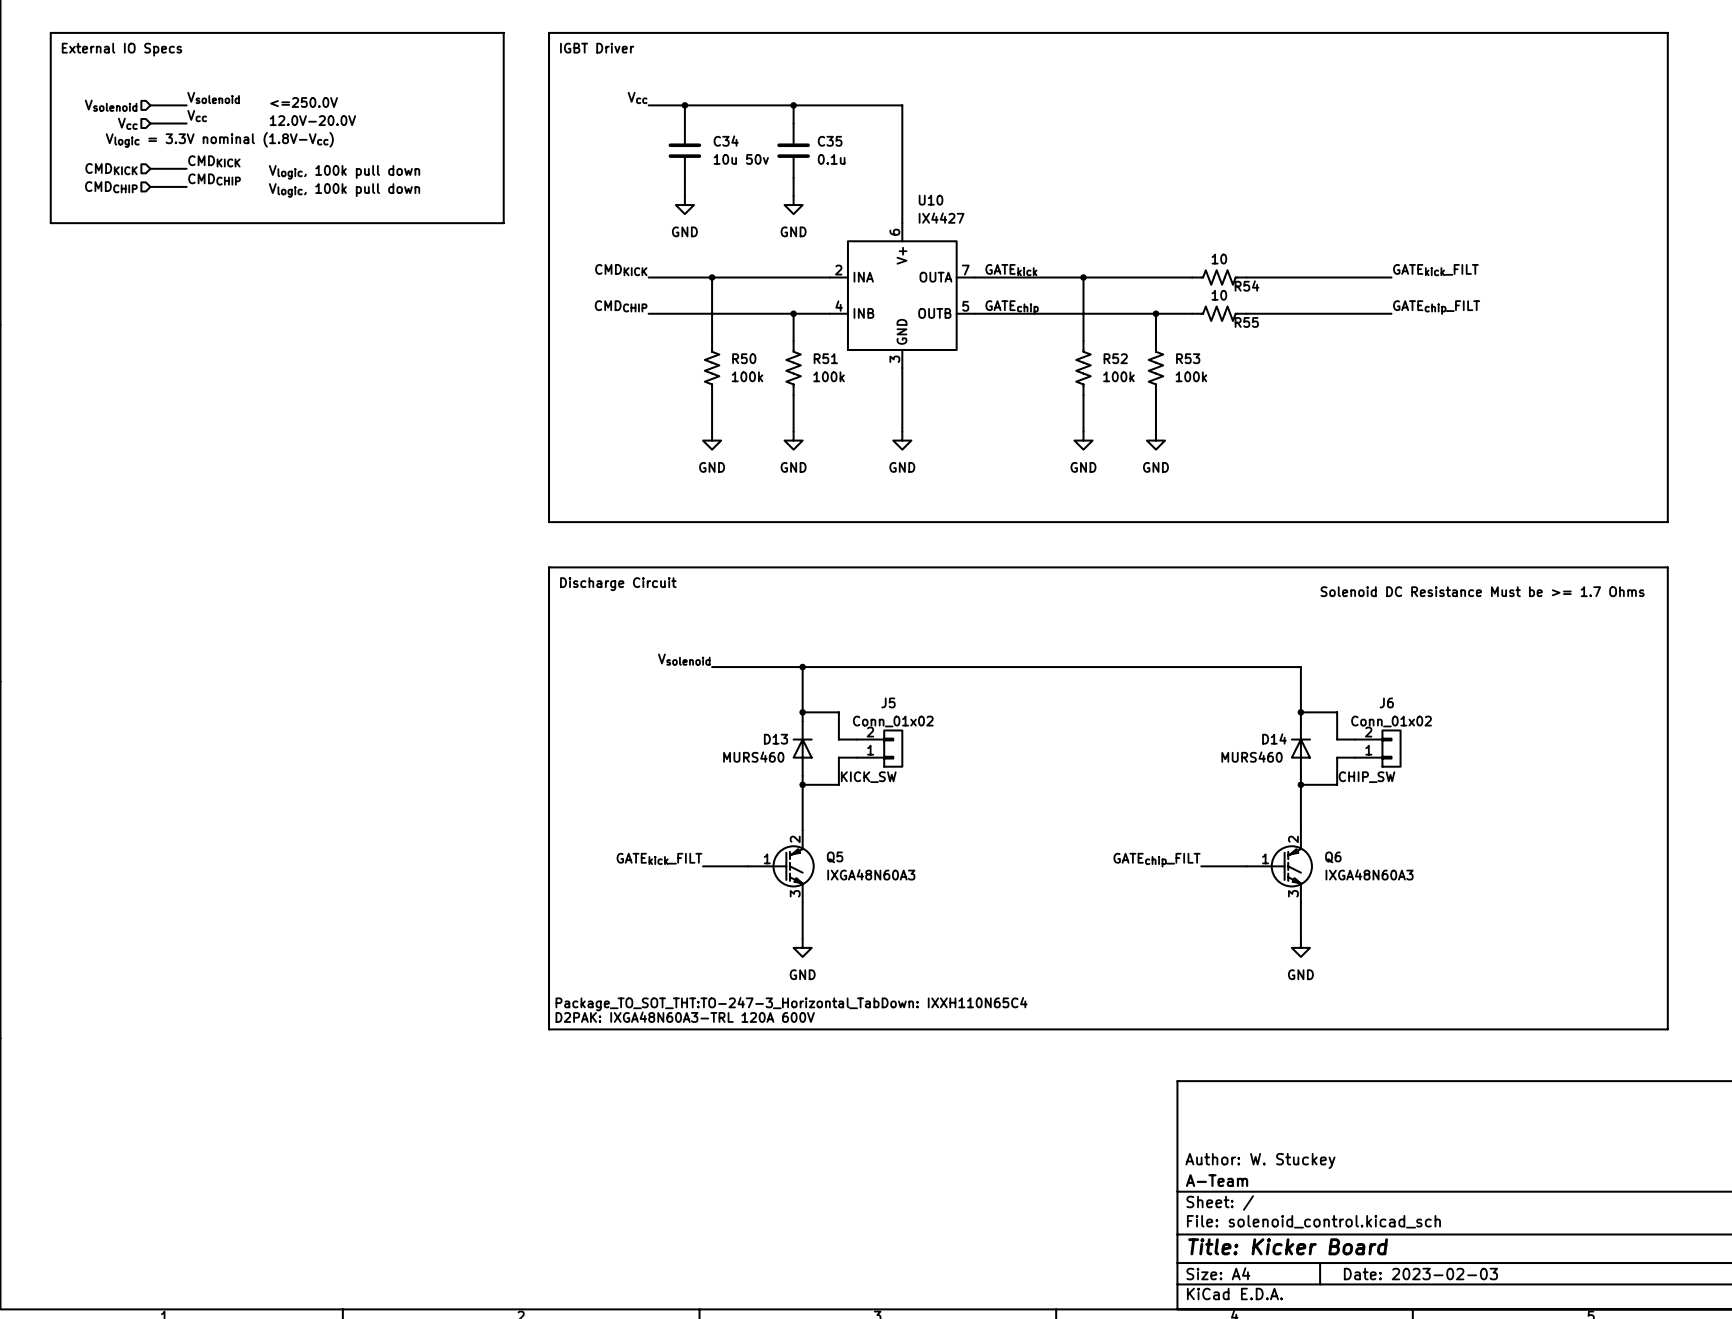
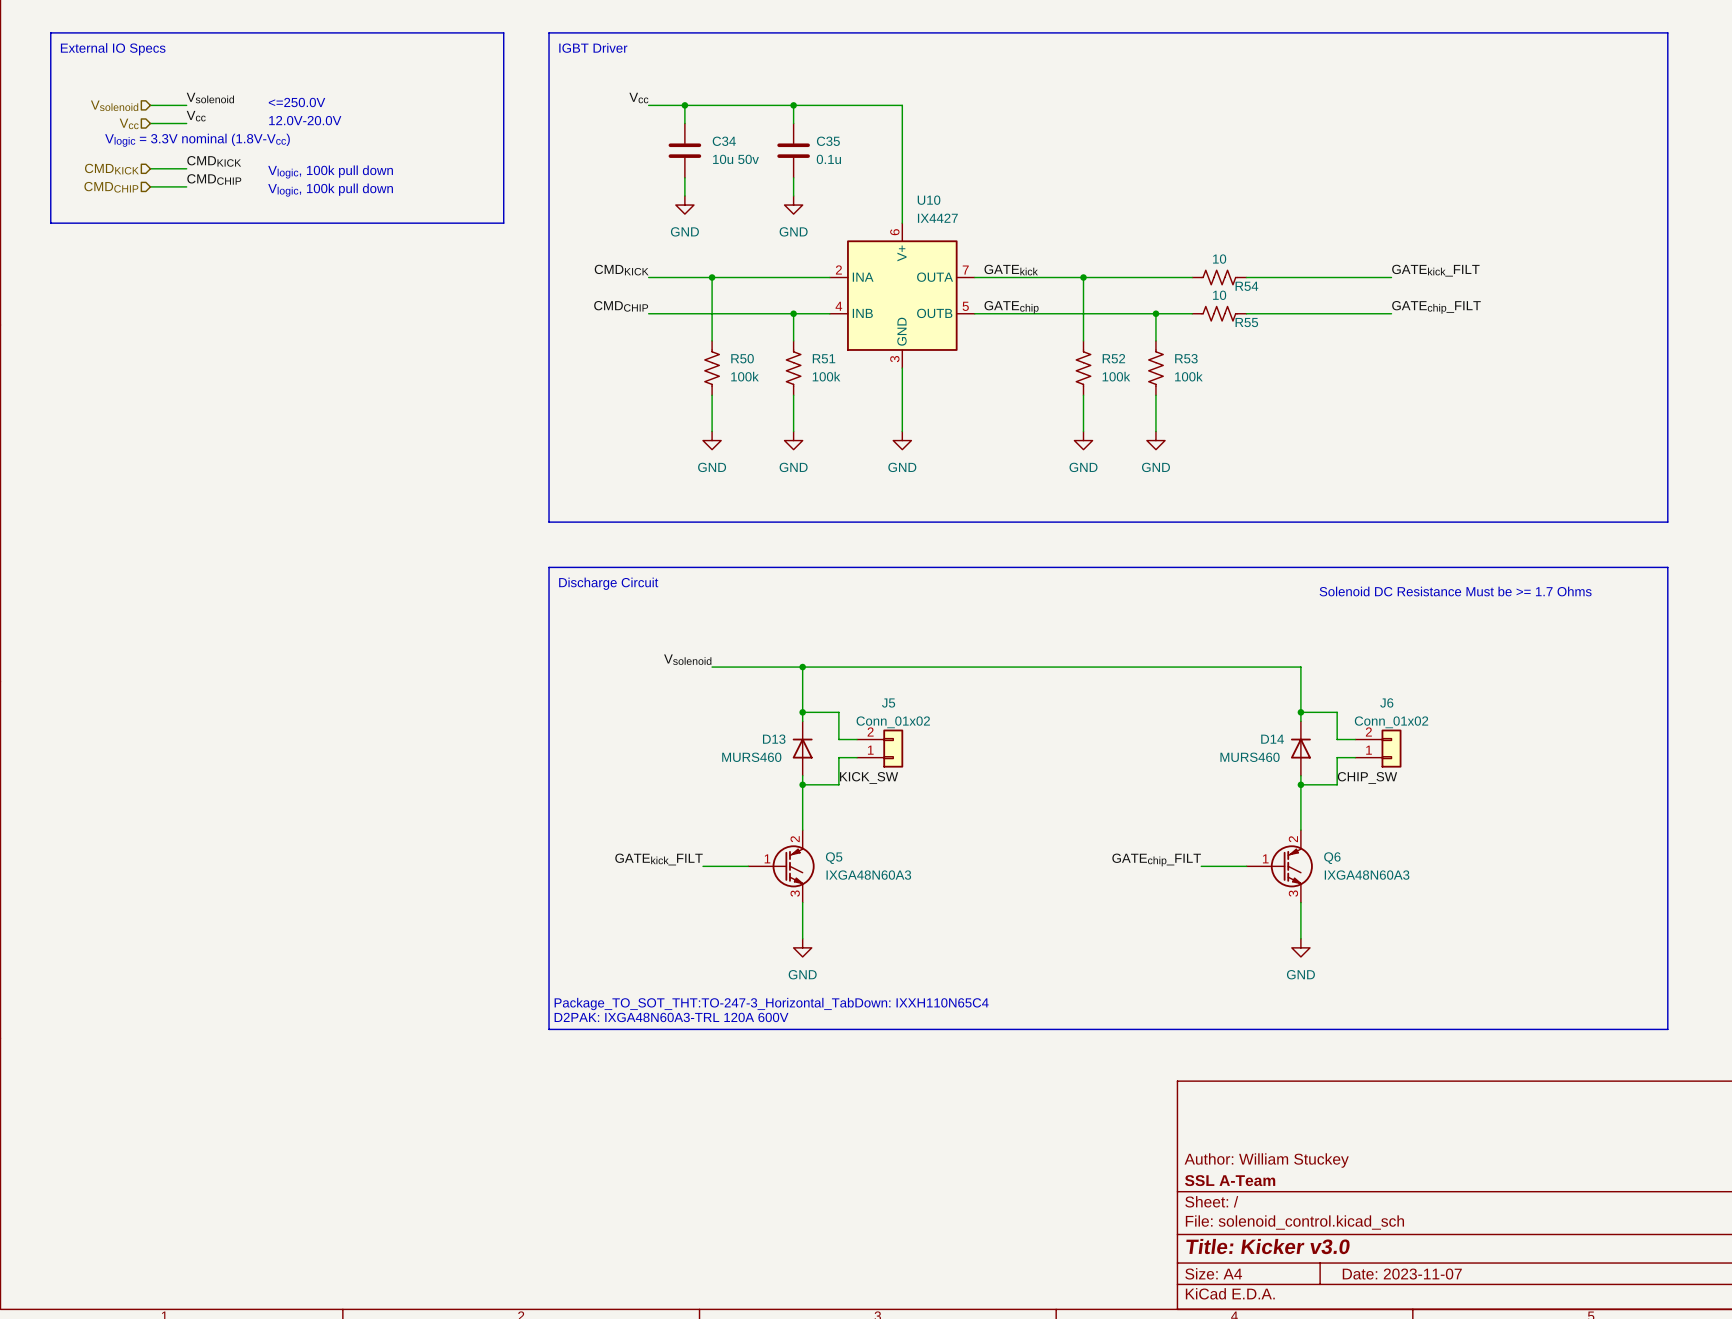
title block: Author: W. Stuckey (1260, 1160) -> Author: William Stuckey (1266, 1160)
title block: A-Team (1217, 1180) -> SSL A-Team (1230, 1180)
title block: Title: Kicker Board (1288, 1246) -> Title: Kicker v3.0 (1268, 1246)
title block: Date: 2023-02-03 (1420, 1274) -> Date: 2023-11-07 (1402, 1274)

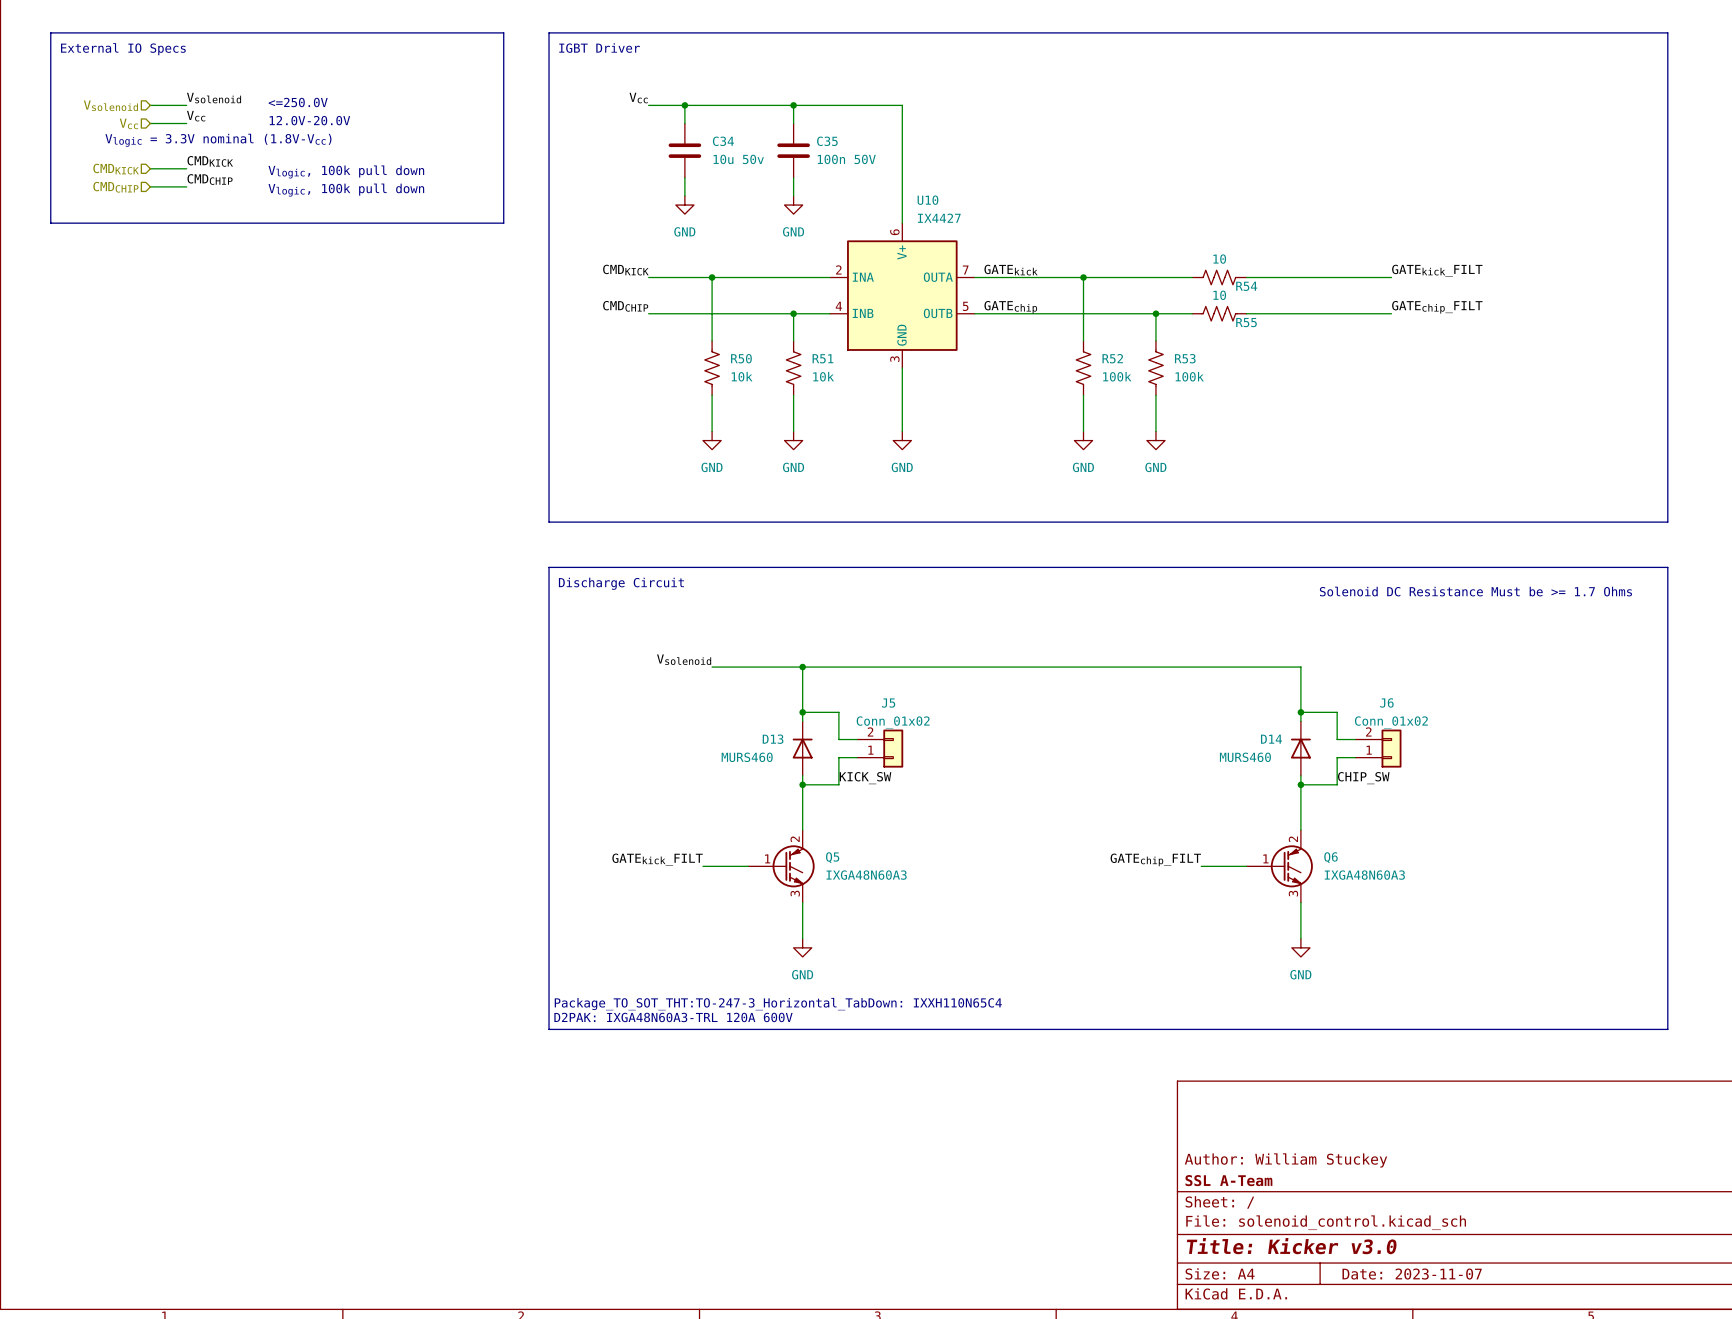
C35 value: 0.1u (828, 159) -> 100n 50V (846, 159)
R50 value: 100k (744, 376) -> 10k (742, 376)
R51 value: 100k (826, 376) -> 10k (823, 376)

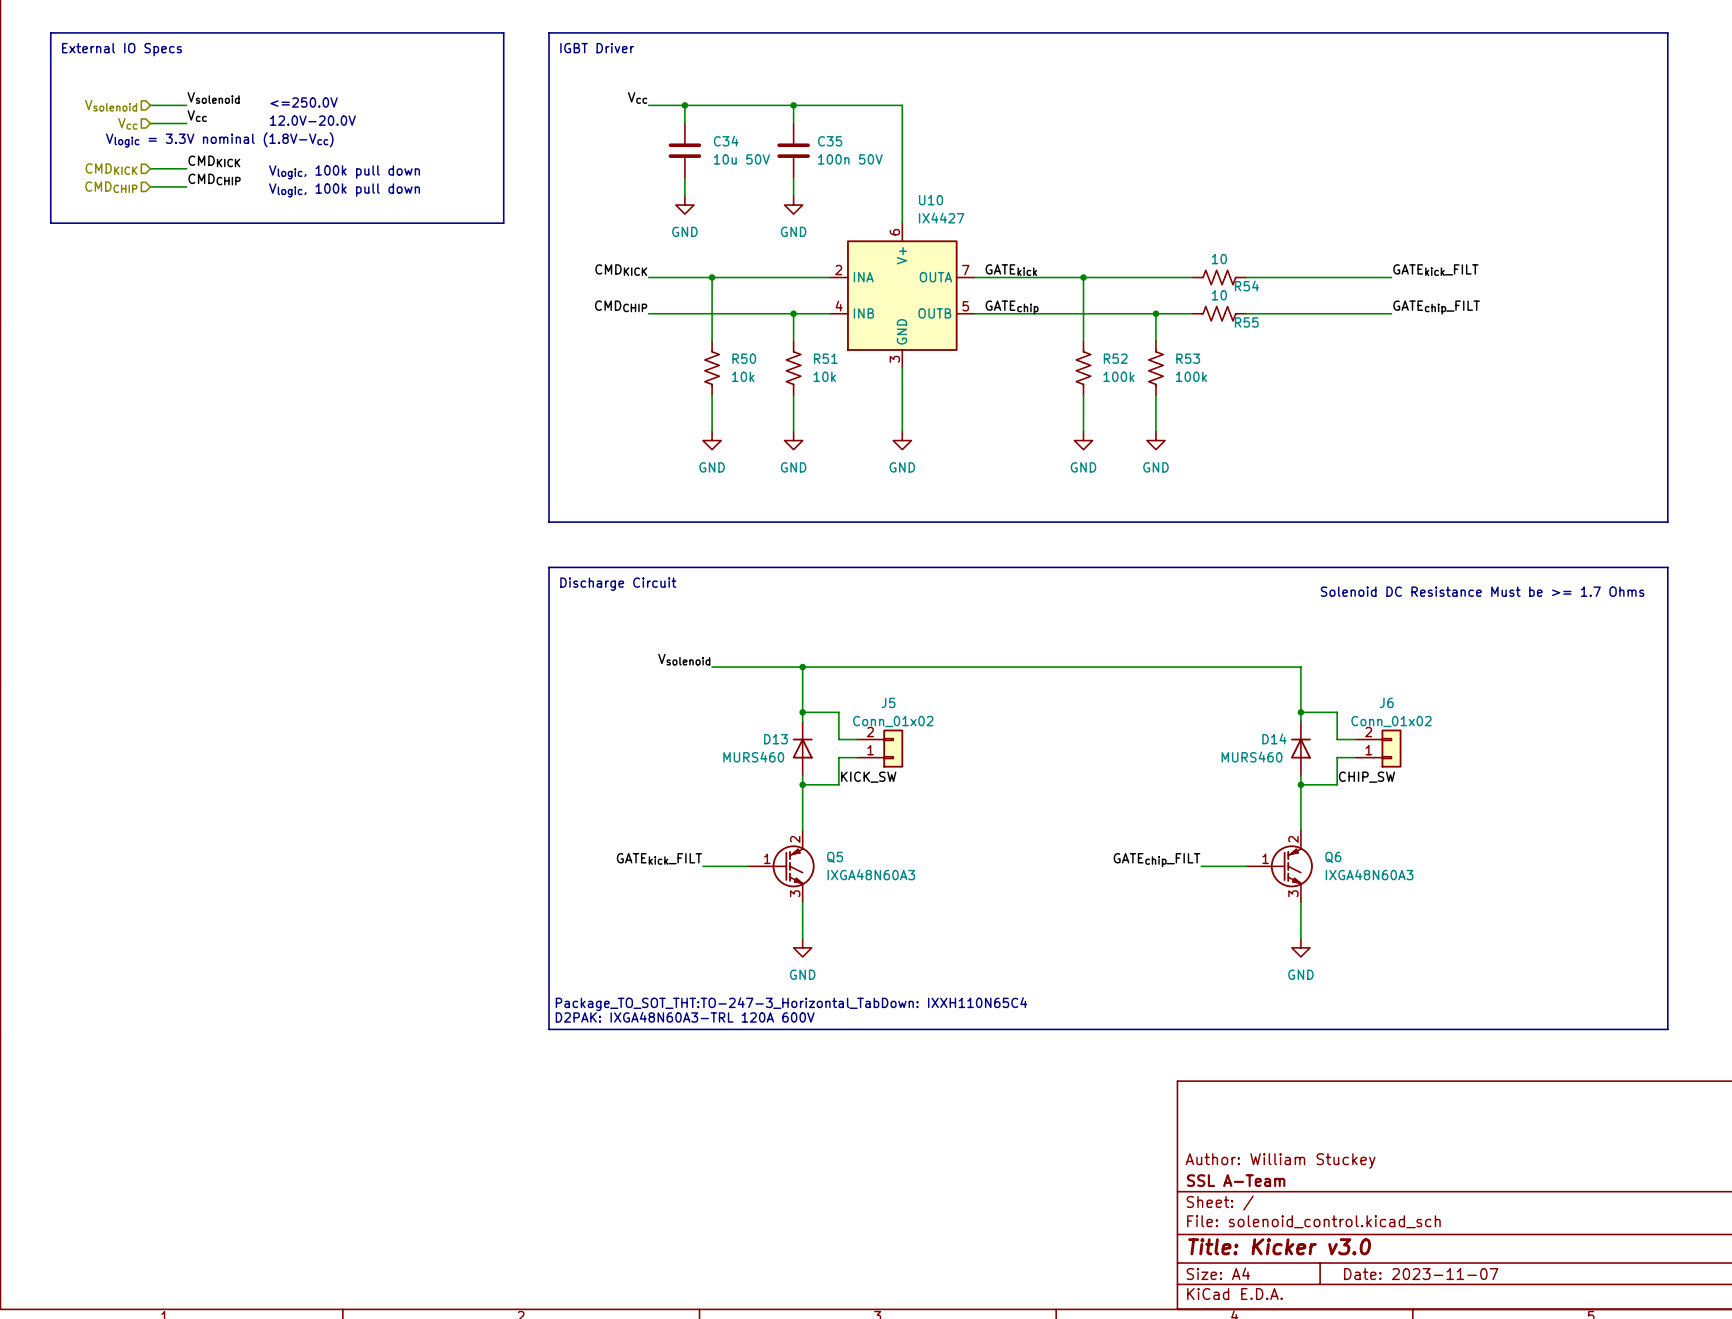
C34 value: 10u 50v (738, 159) -> 10u 50V (741, 159)

